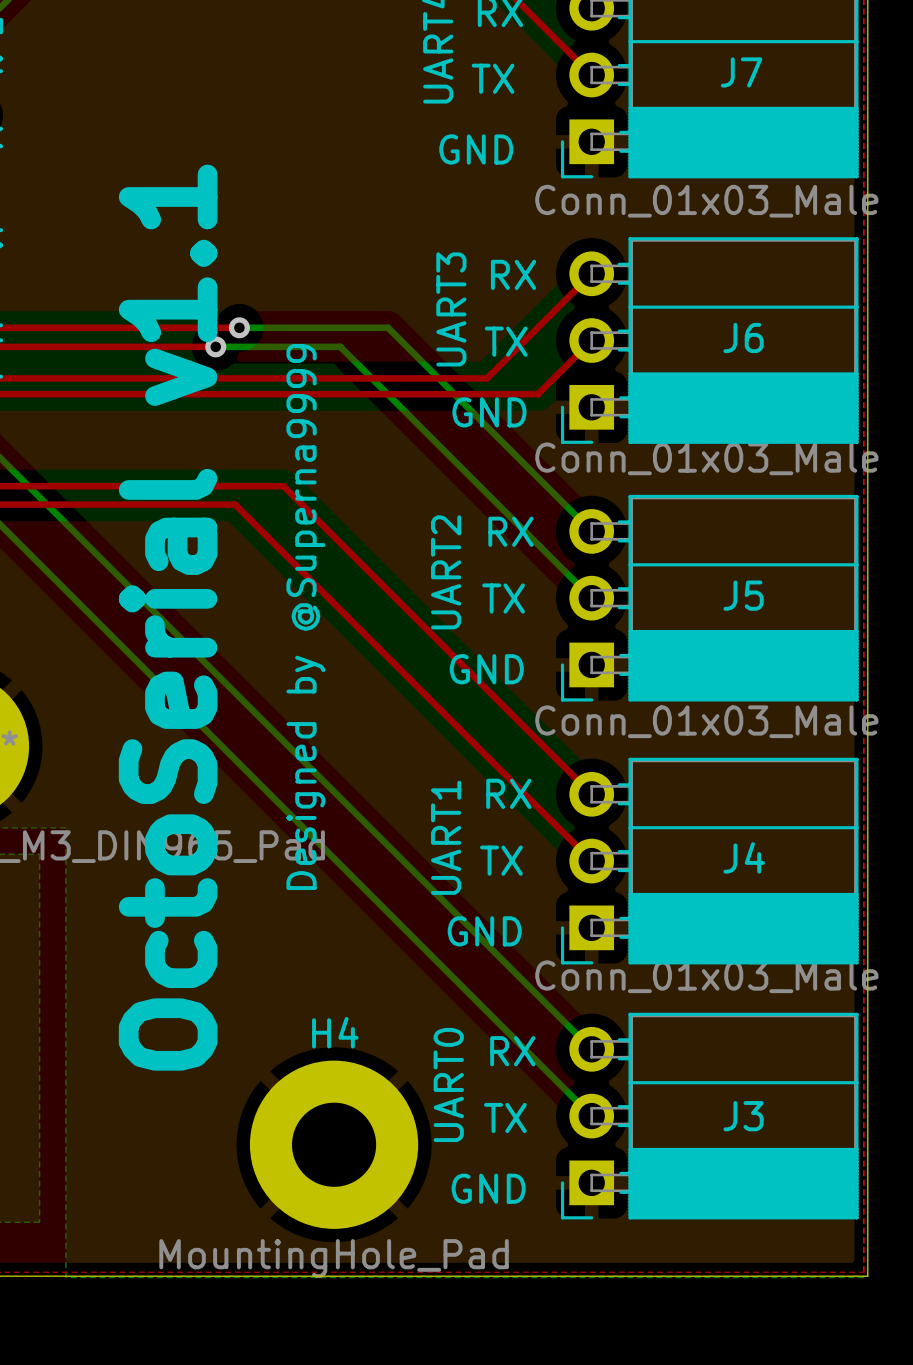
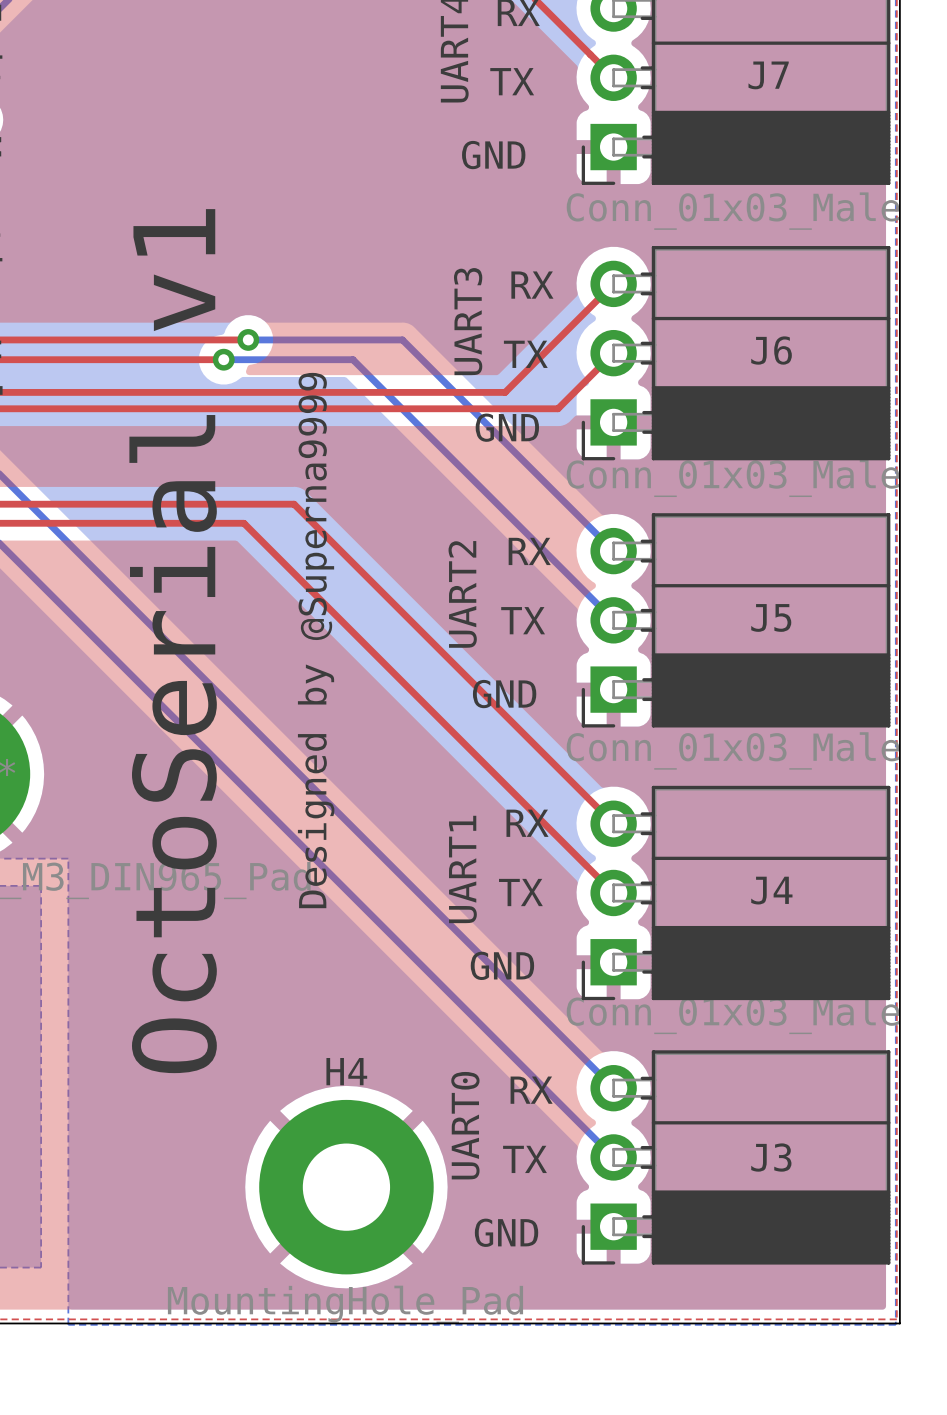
text: OctoSerial v1.1 (168, 617) -> OctoSerial v1 (173, 641)

